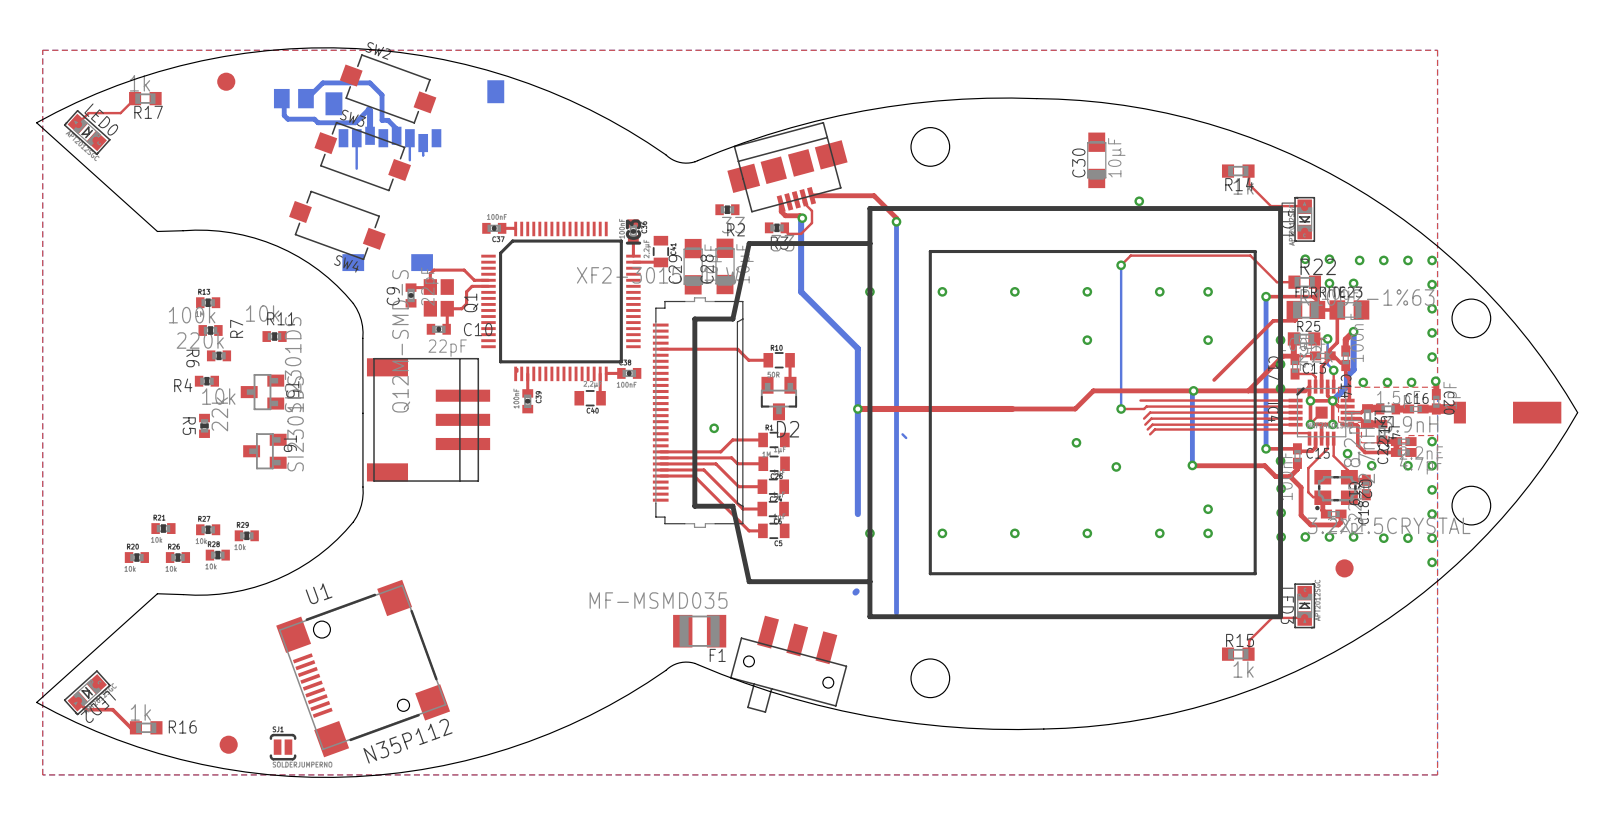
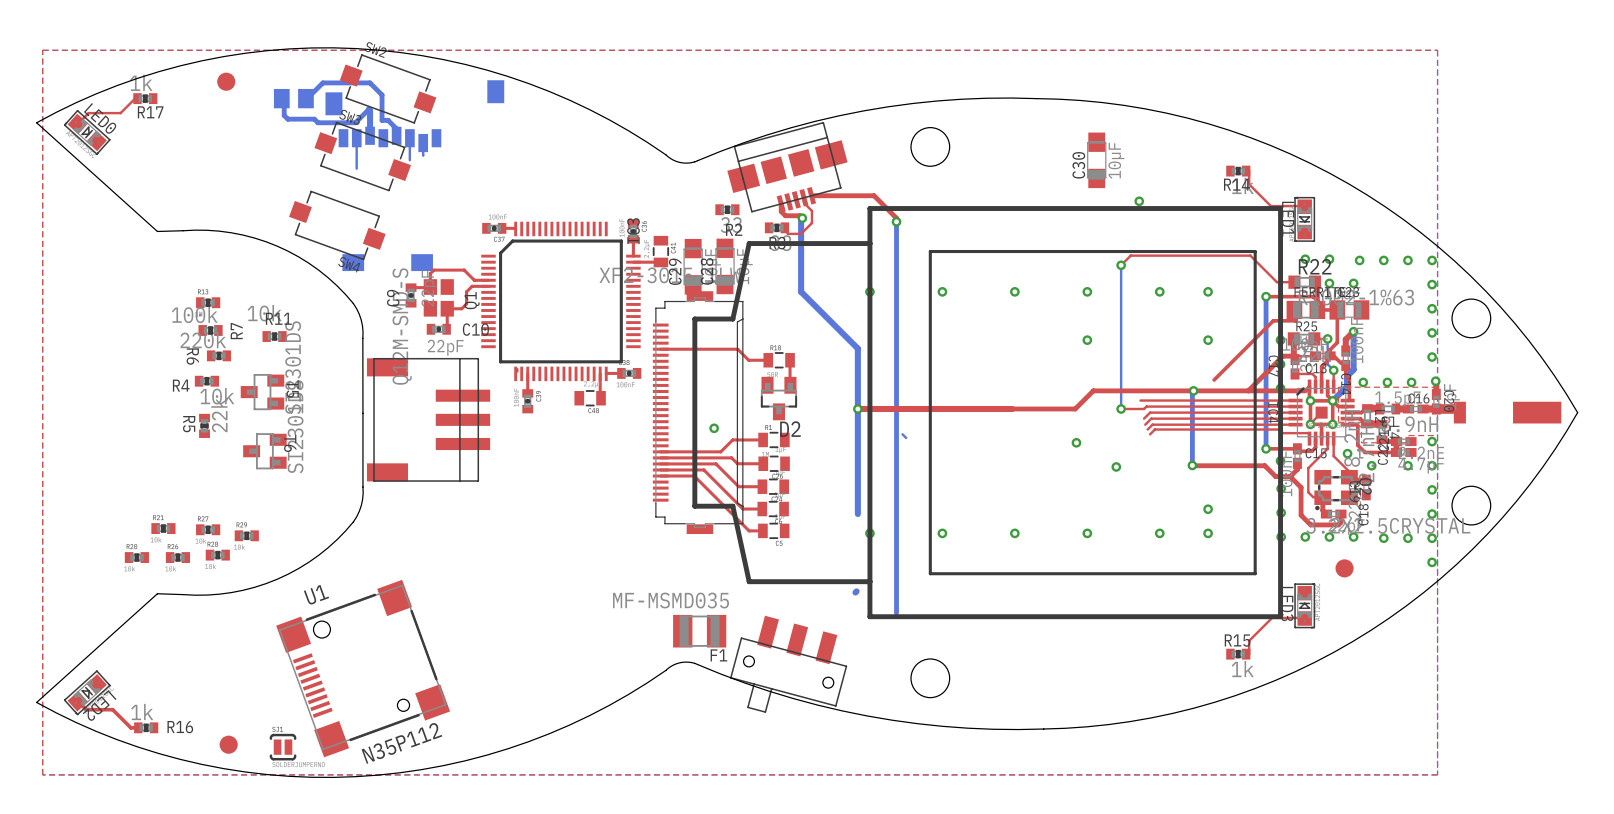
R17 footprint: [129, 91, 162, 106] -> [133, 93, 158, 105]
R14 footprint: [1221, 164, 1255, 178] -> [1226, 165, 1251, 177]
part footprint: [652, 297, 744, 528] -> [652, 291, 744, 534]
R15 footprint: [1221, 647, 1255, 661] -> [1226, 648, 1251, 660]
R16 footprint: [129, 721, 163, 735] -> [134, 722, 159, 734]

